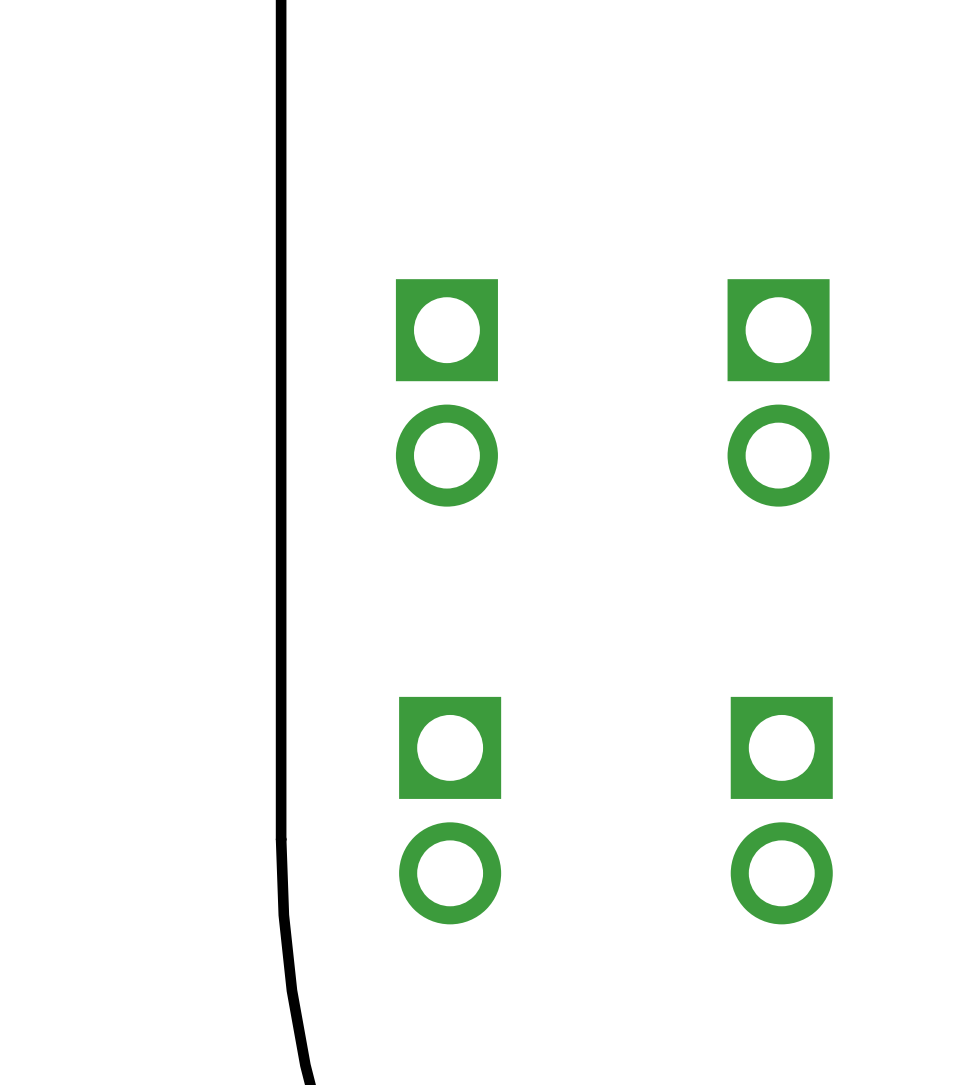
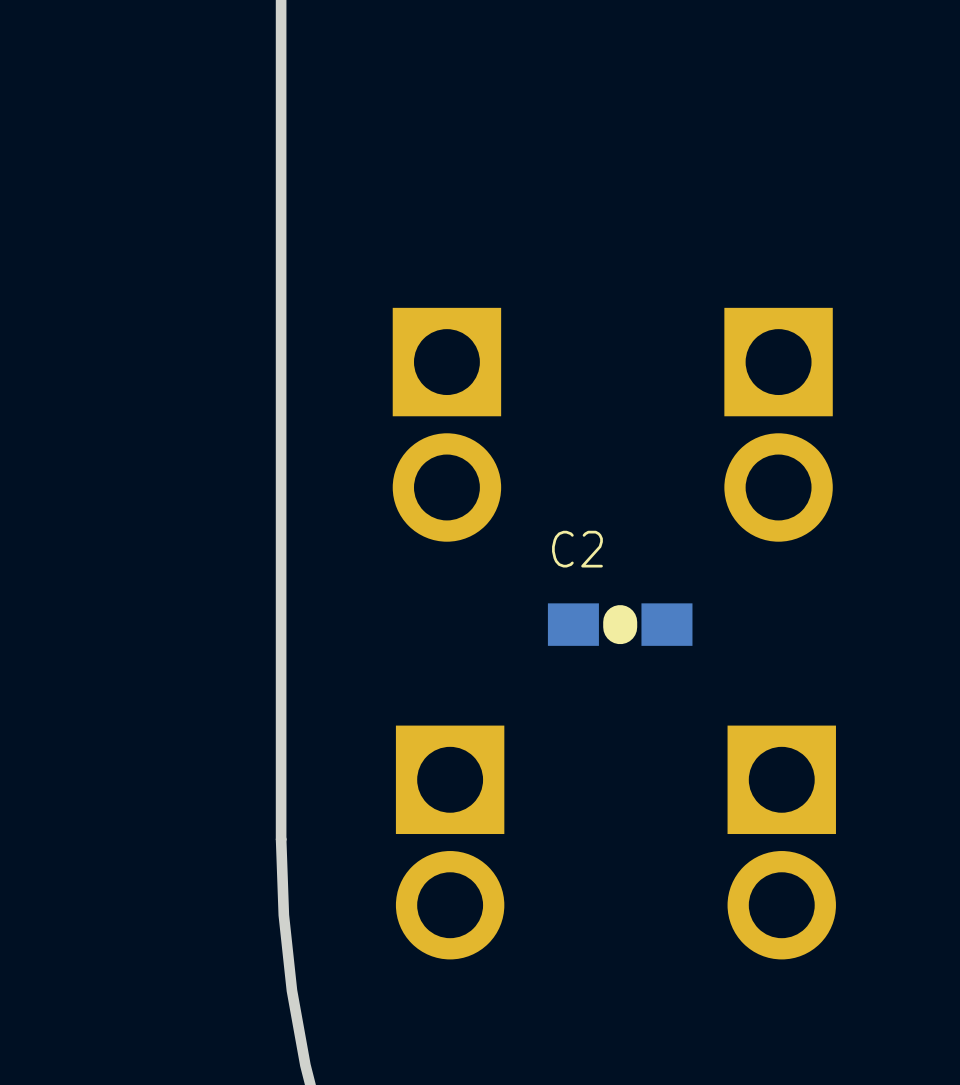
part footprint: [395, 279, 498, 507] -> [392, 307, 502, 542]
part footprint: [727, 279, 830, 507] -> [724, 307, 833, 542]
C2: none -> (620, 624)
part footprint: [399, 696, 502, 925] -> [395, 725, 505, 960]
part footprint: [730, 696, 833, 925] -> [727, 725, 836, 960]

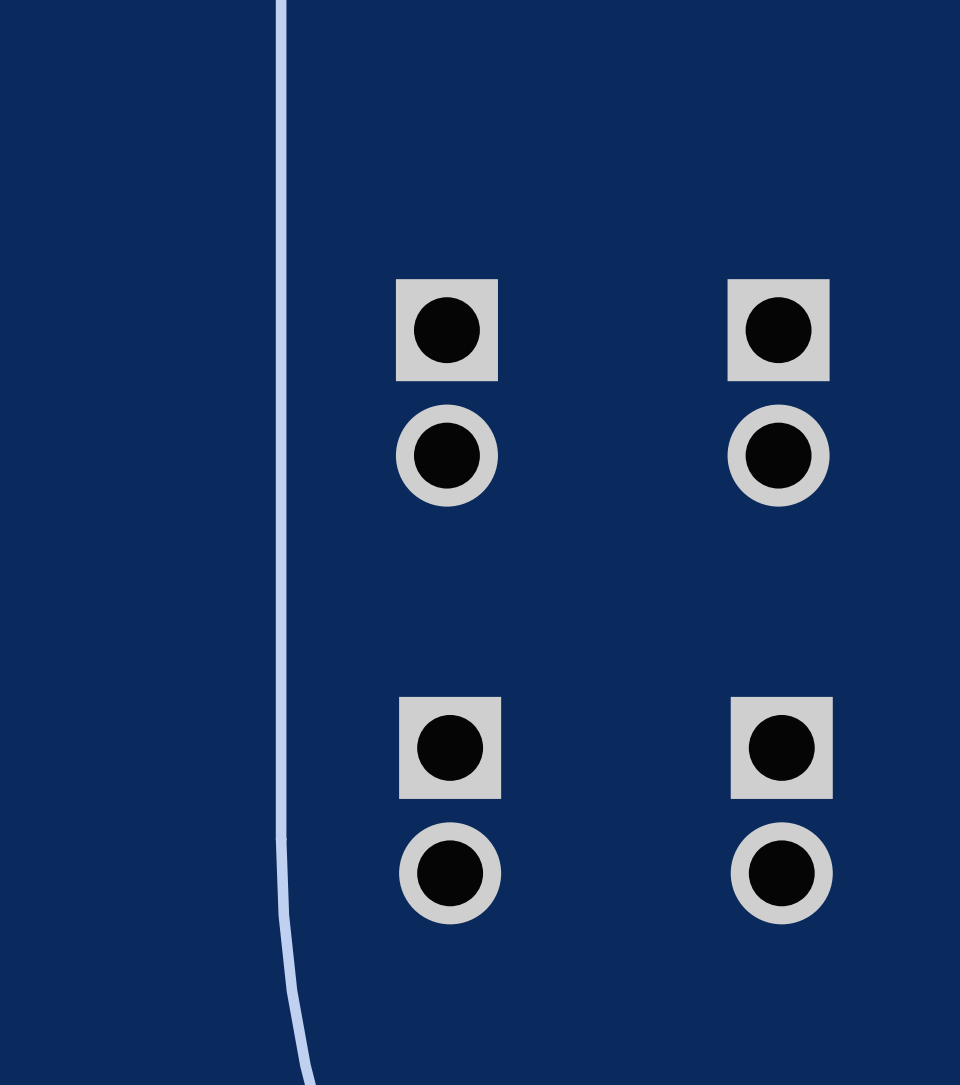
part footprint: [392, 307, 502, 542] -> [395, 279, 498, 507]
part footprint: [724, 307, 833, 542] -> [727, 279, 830, 507]
C2: (620, 624) -> none
part footprint: [395, 725, 505, 960] -> [399, 696, 502, 925]
part footprint: [727, 725, 836, 960] -> [730, 696, 833, 925]

